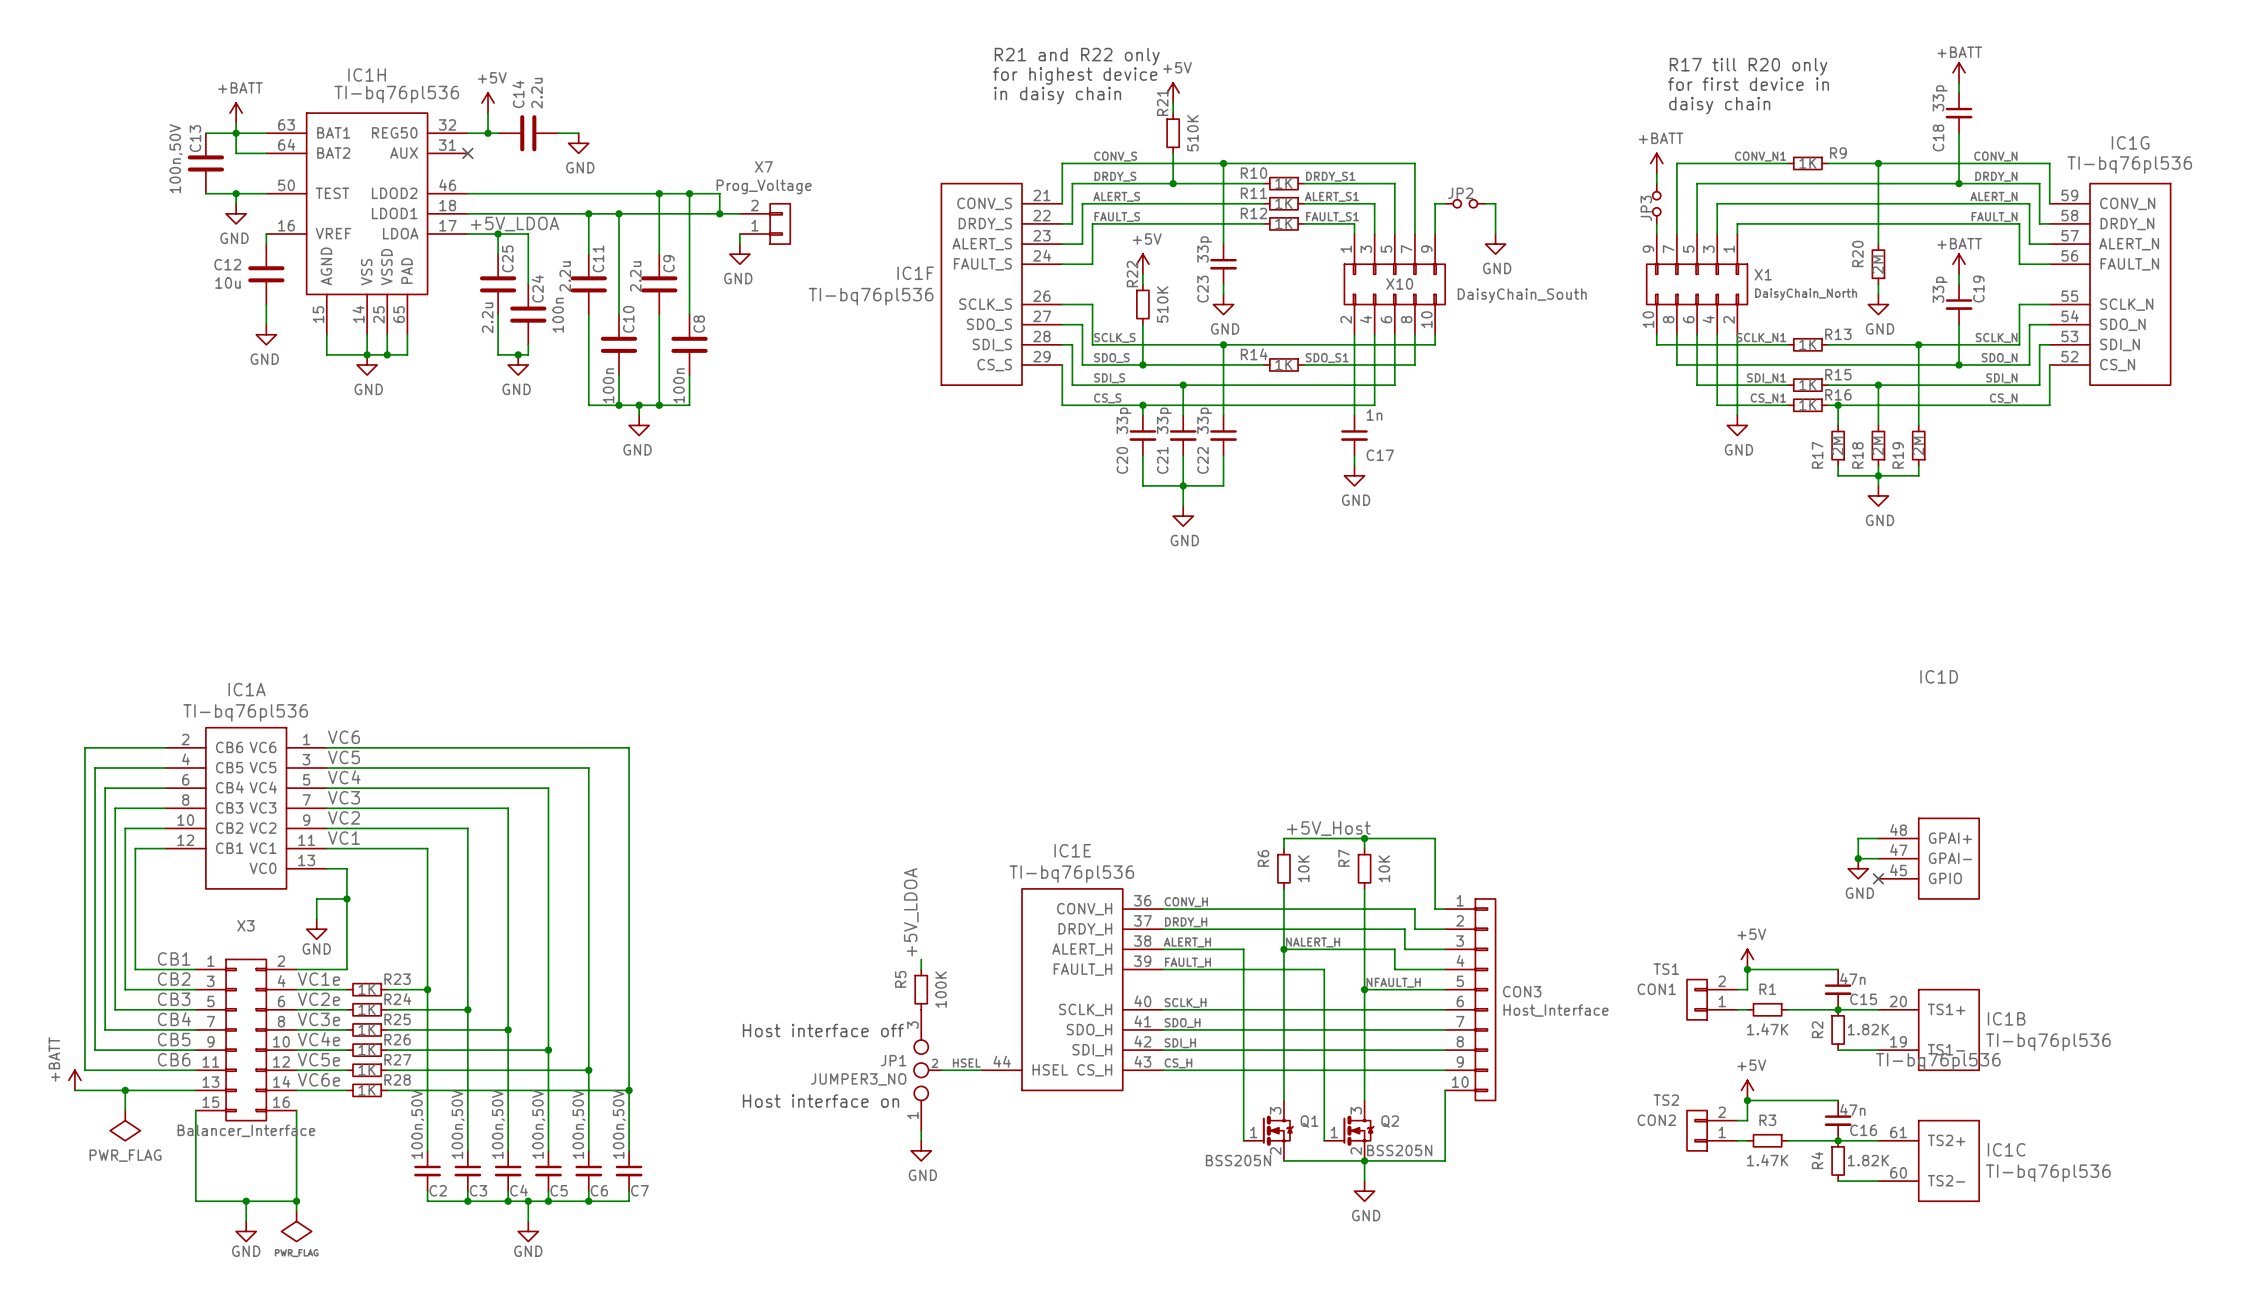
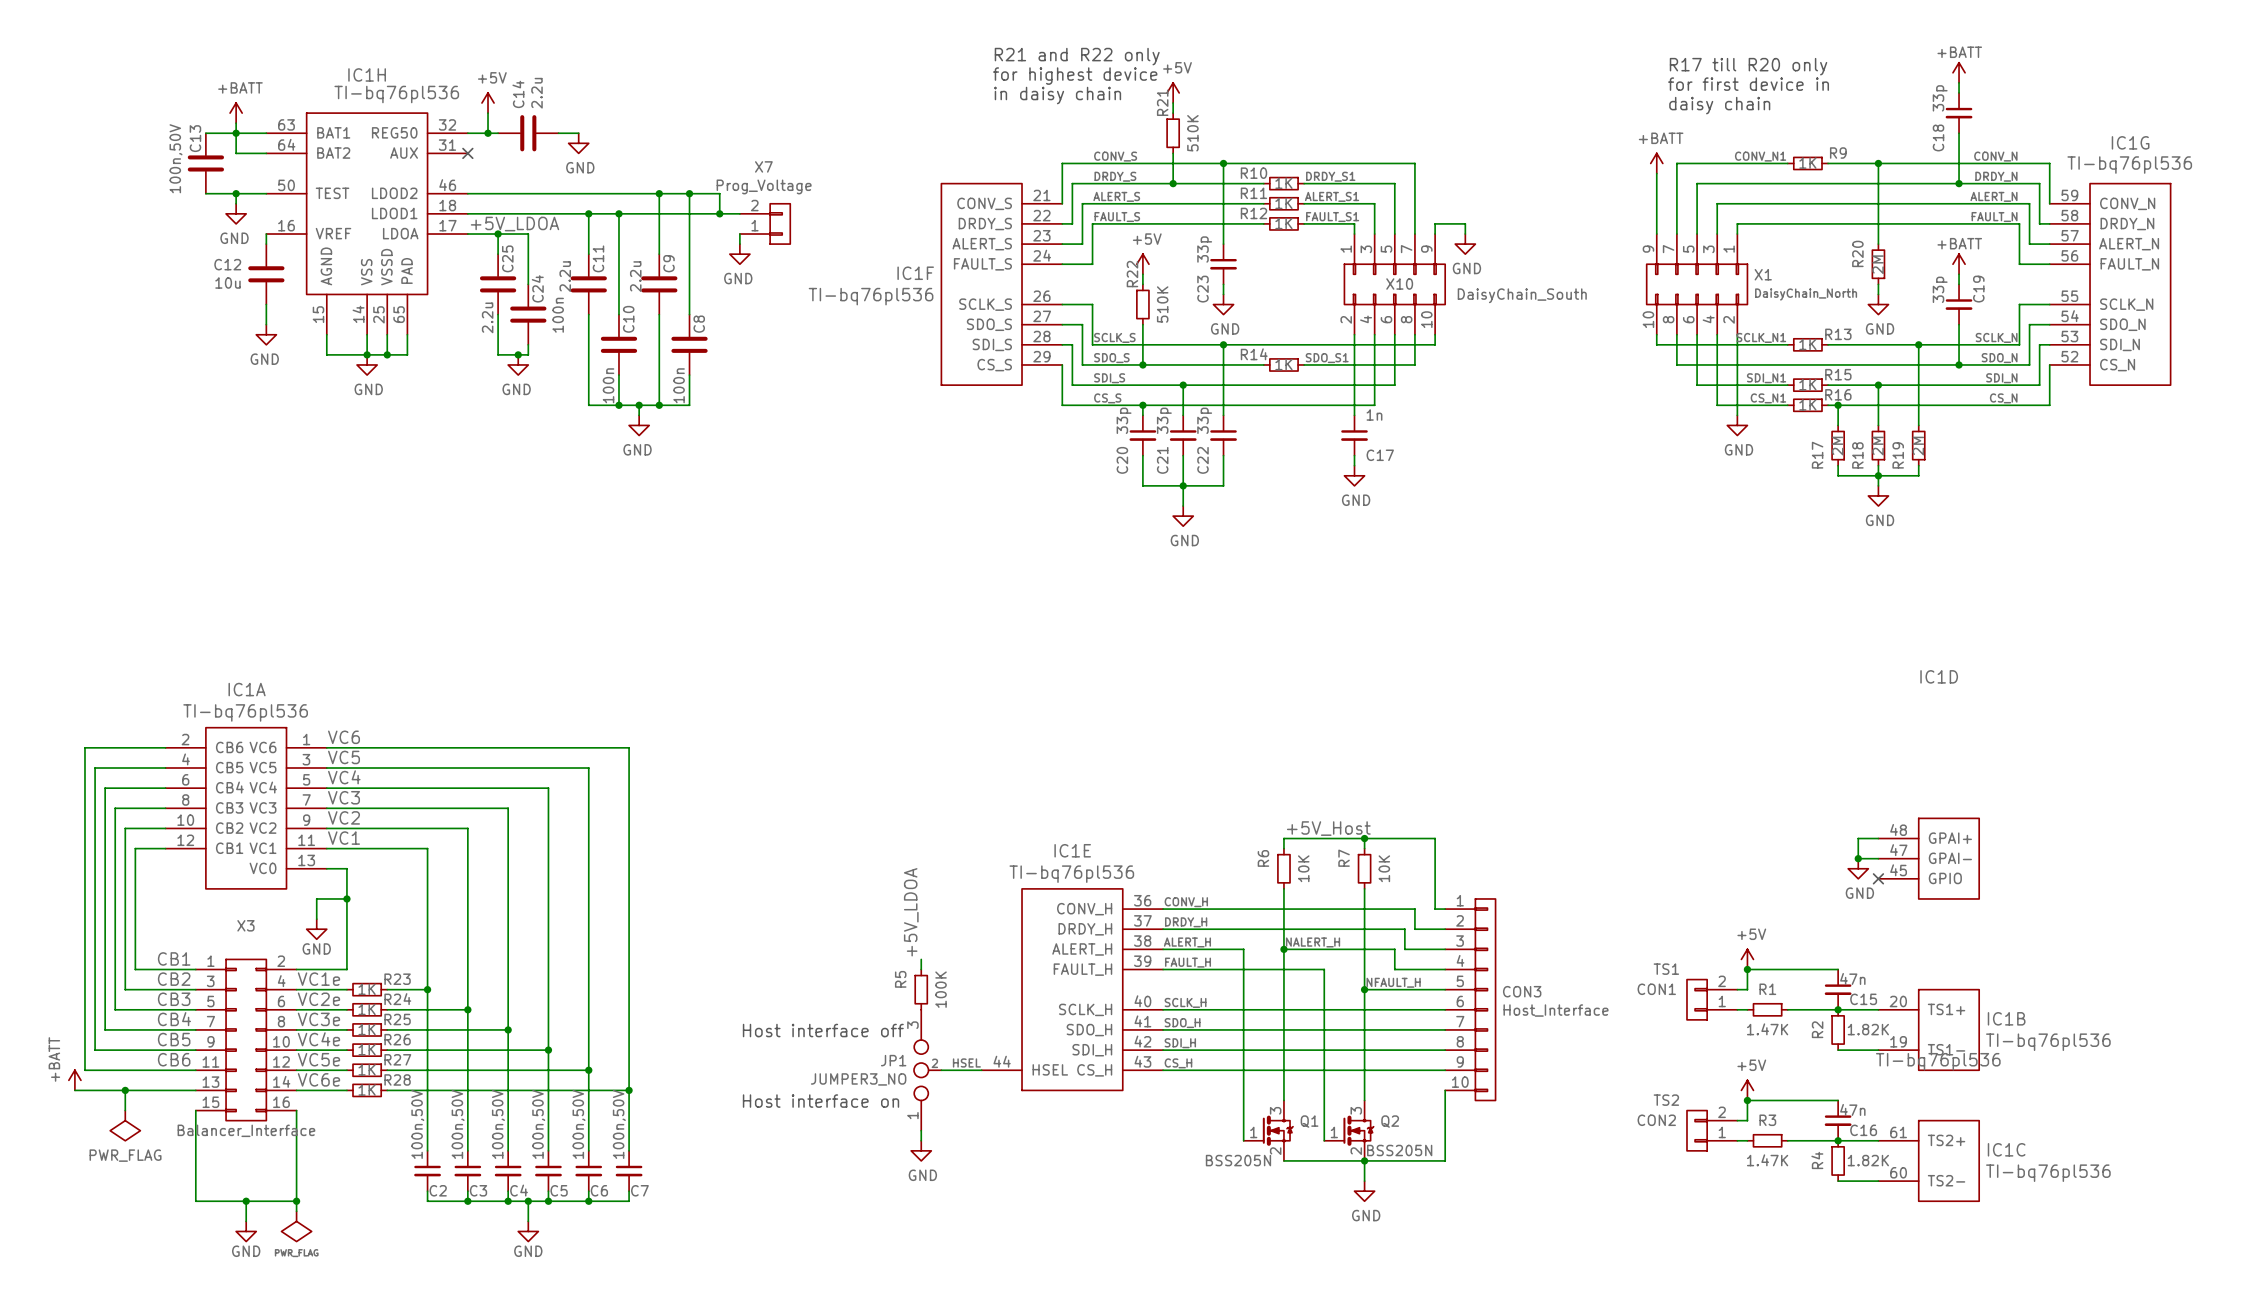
wire: (1445, 203) (1435, 203) (1435, 223) -> (1465, 234) (1465, 223) (1435, 223)
JP2: (1465, 203) -> none
wire: (1485, 203) (1495, 203) (1495, 234) -> none
JP3: (1656, 203) -> none
power symbol position: GND (1495, 244) -> GND (1465, 244)

